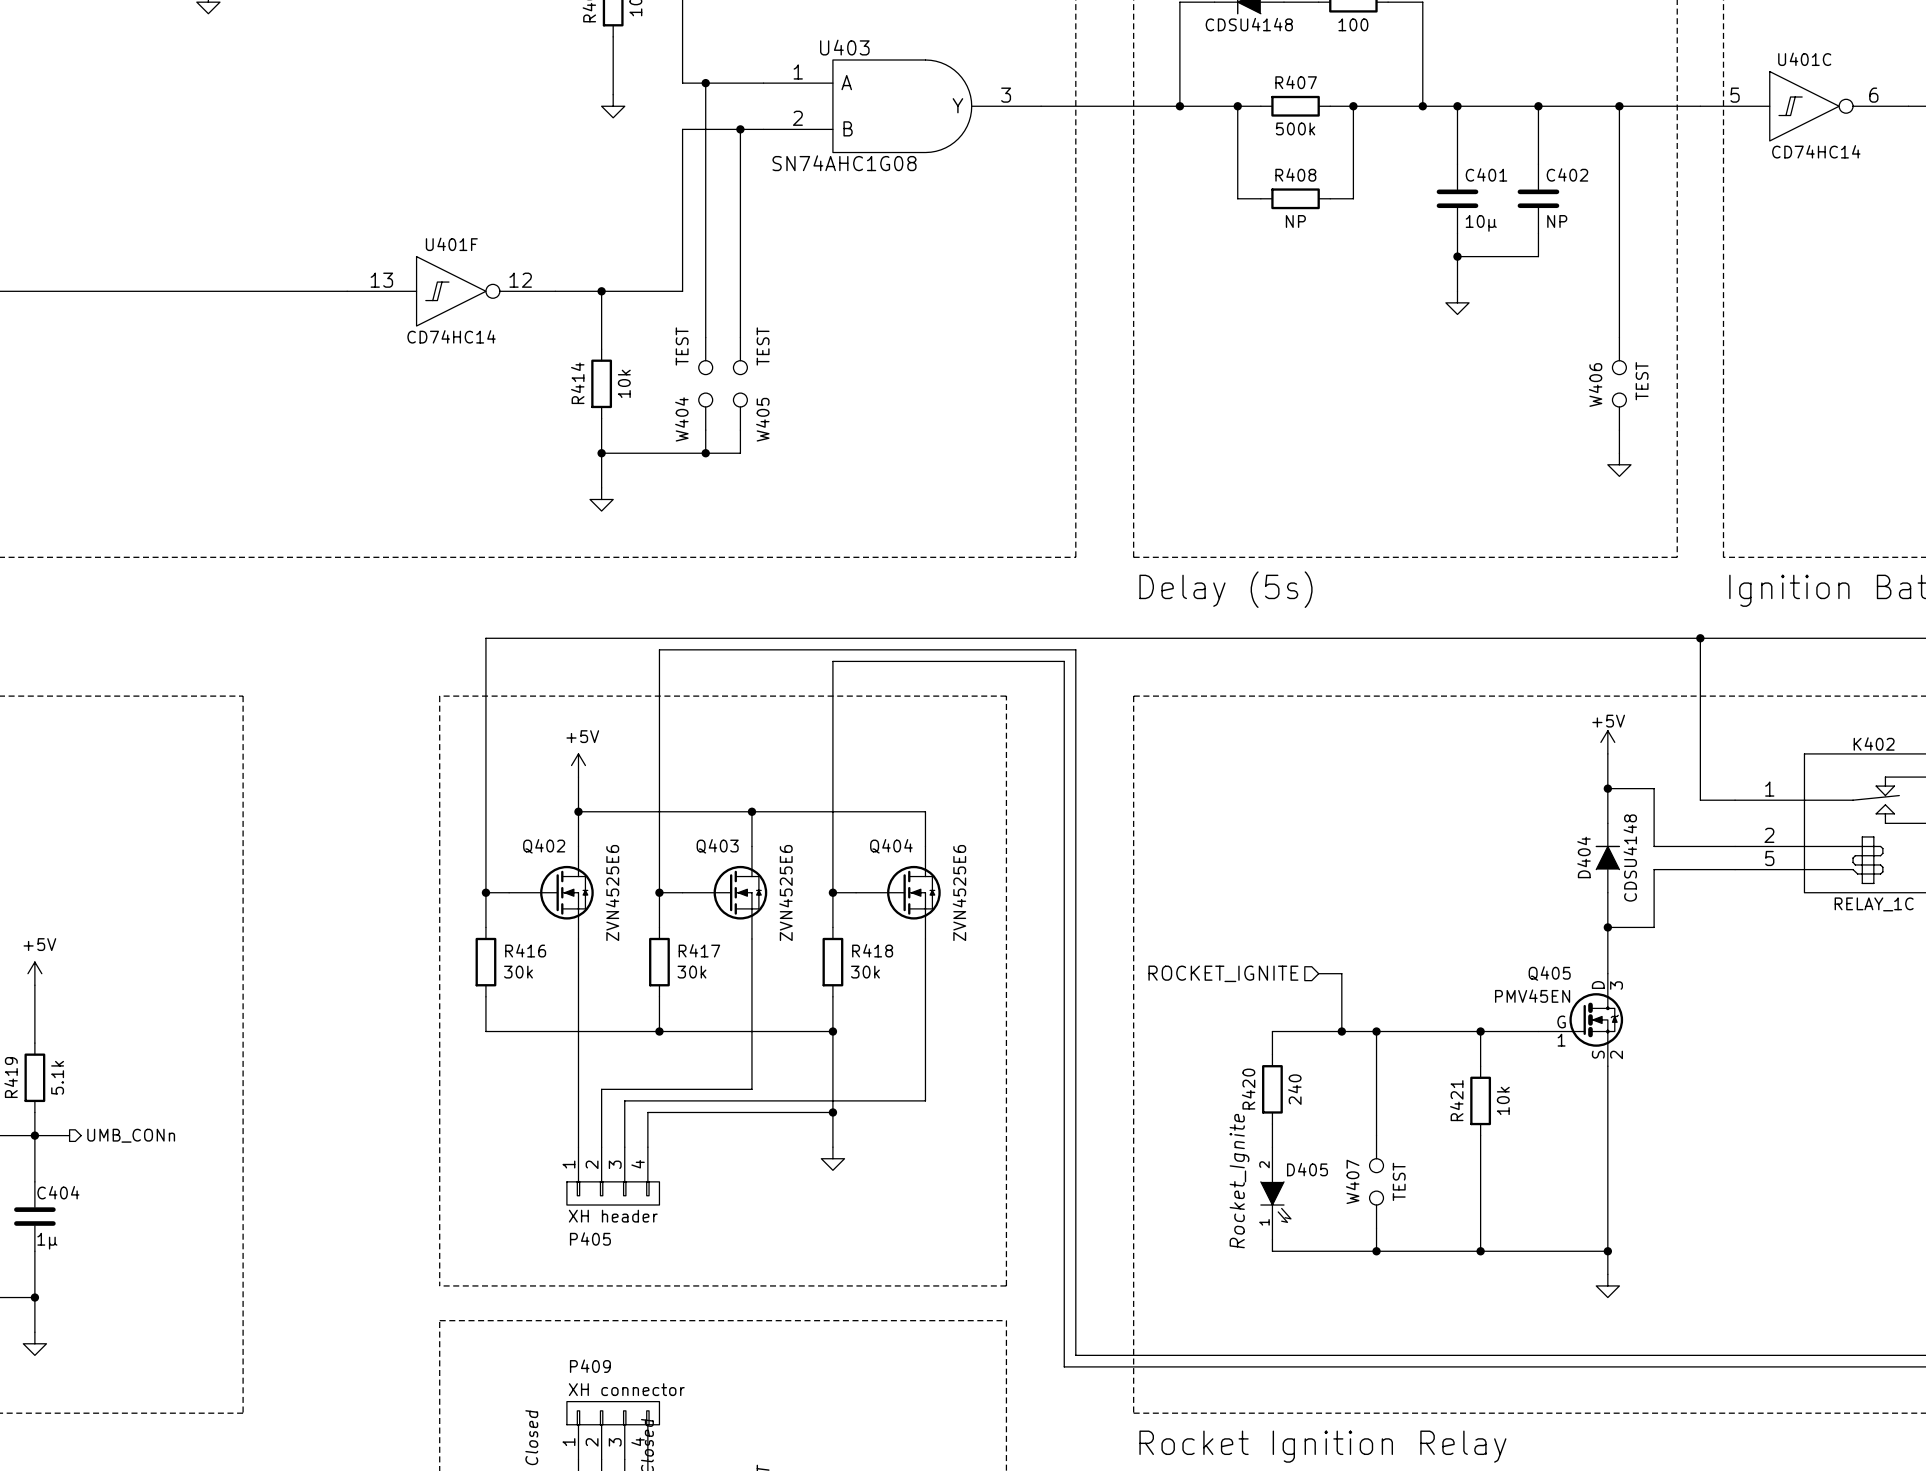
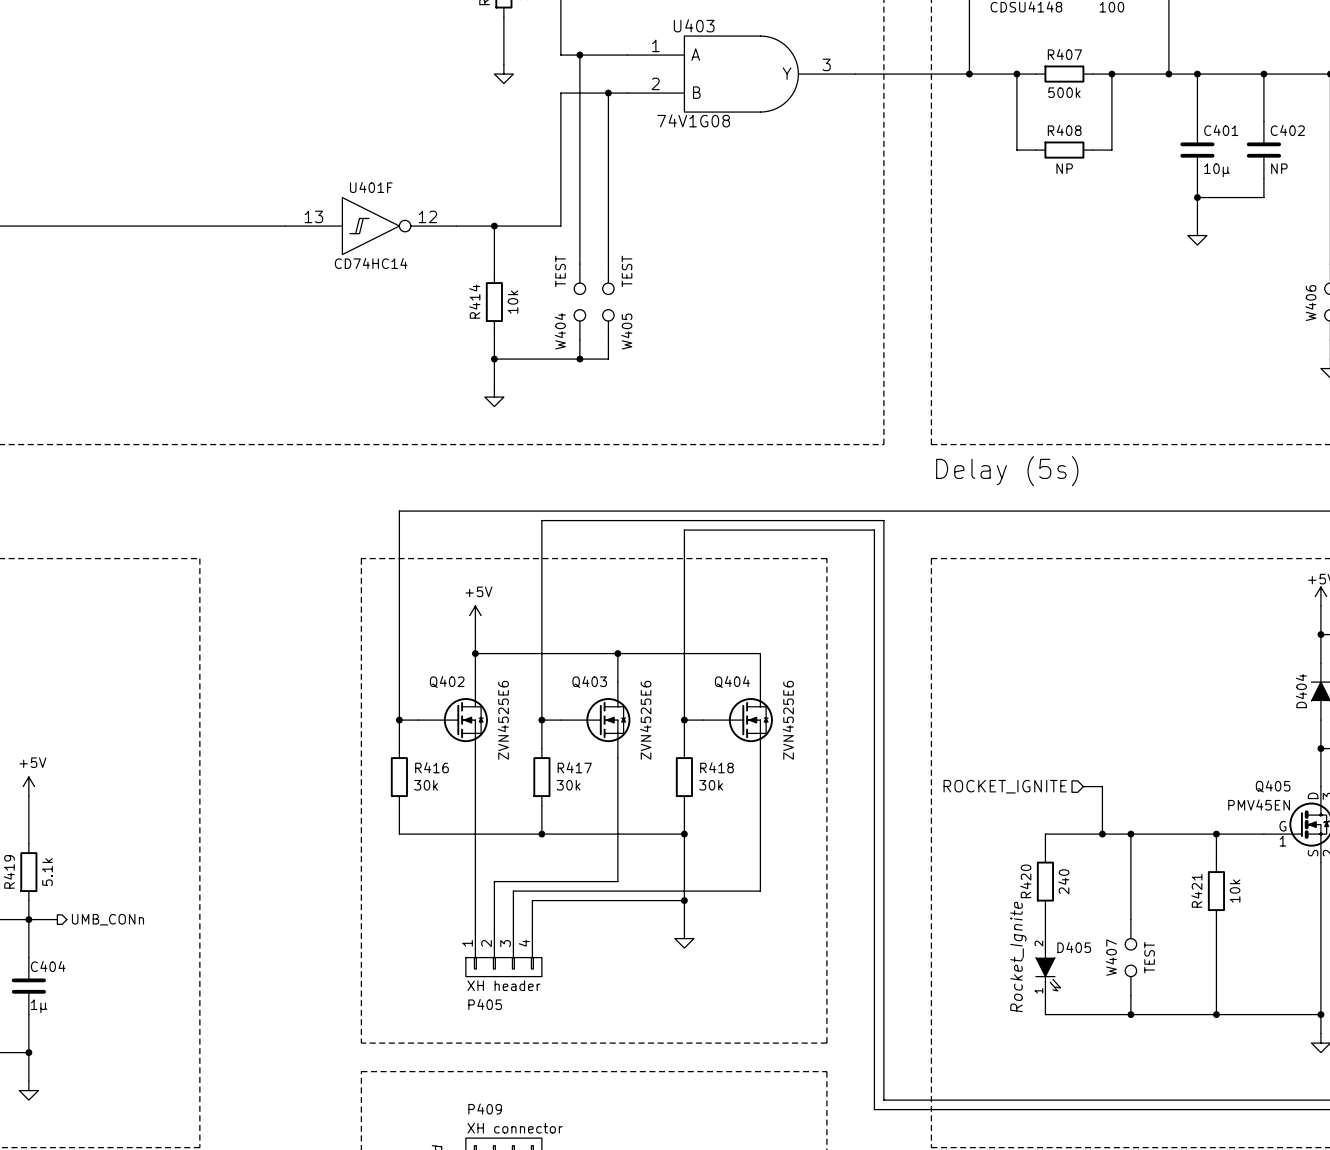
U403 value: SN74AHC1G08 (844, 163) -> 74V1G08 (693, 120)

